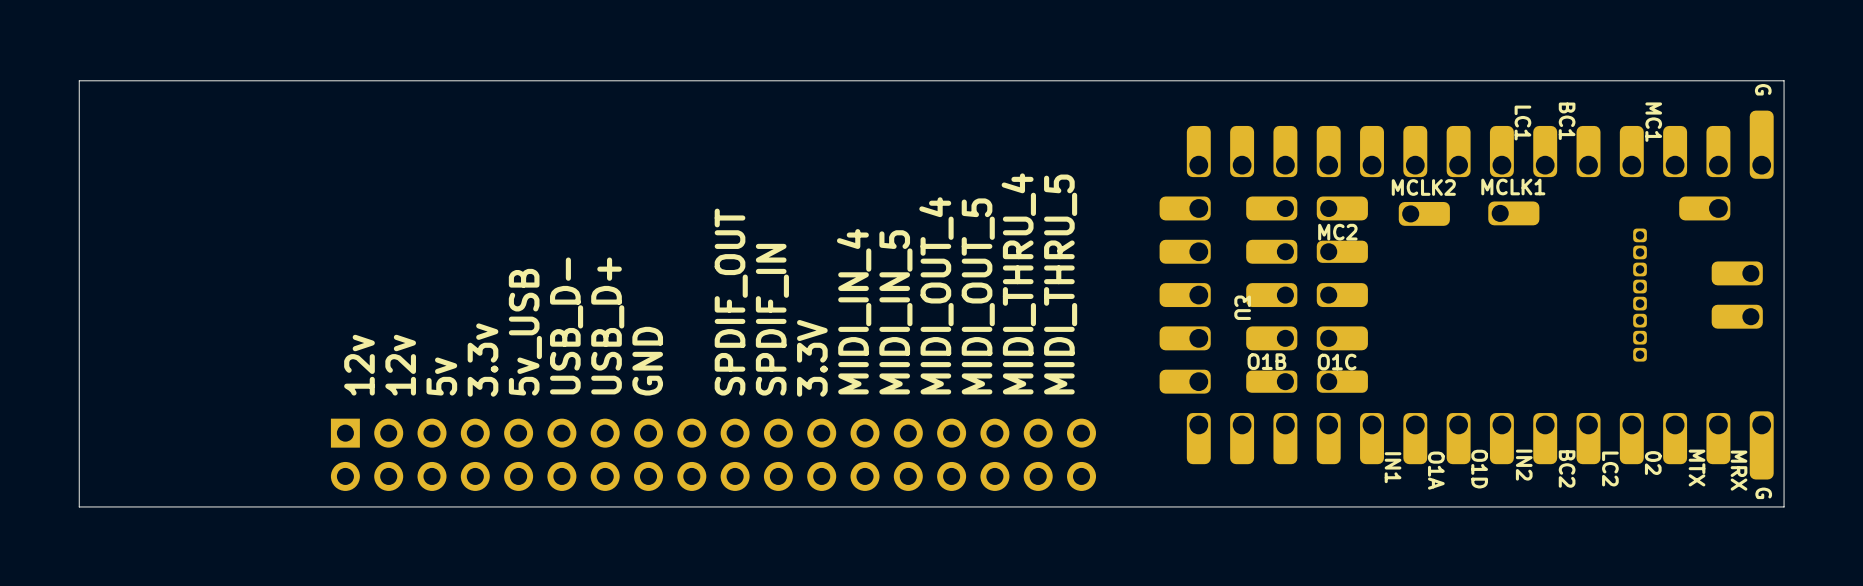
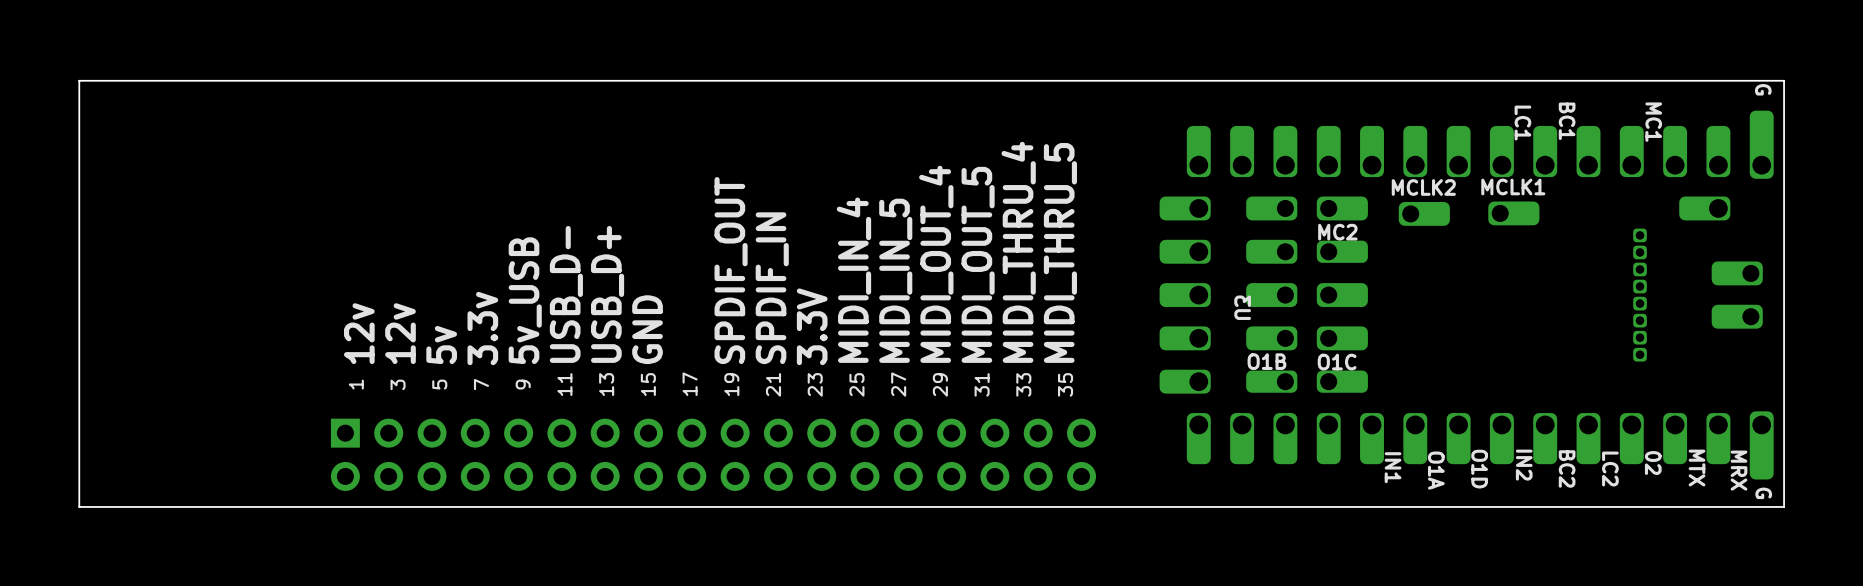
text position: MIDI_THRU_4 (1018, 283) -> MIDI_THRU_4 (1018, 252)
text position: MIDI_THRU_5 (1060, 284) -> MIDI_THRU_5 (1060, 252)
text position: MIDI_OUT_4 (936, 295) -> MIDI_OUT_4 (936, 264)
text position: MIDI_OUT_5 (978, 296) -> MIDI_OUT_5 (978, 264)
text position: SPDIF_OUT (731, 302) -> SPDIF_OUT (731, 270)
text position: MIDI_IN_4 (854, 311) -> MIDI_IN_4 (853, 280)
text position: MIDI_IN_5 (895, 312) -> MIDI_IN_5 (895, 280)
text position: SPDIF_IN (772, 319) -> SPDIF_IN (772, 288)
text position: USB_D- (566, 325) -> USB_D- (566, 294)
text position: USB_D+ (607, 325) -> USB_D+ (607, 294)
text position: 5v_USB (525, 332) -> 5v_USB (525, 300)
text: none -> 12v (359, 333)
text: none -> 12v (400, 333)
text position: 3.3V (812, 358) -> 3.3V (812, 326)
text position: 3.3v (483, 360) -> 3.3v (482, 328)
text position: GND (647, 361) -> GND (647, 329)
text: 12v (359, 365) -> none
text: 12v (400, 365) -> none
text position: 5v (441, 376) -> 5v (441, 345)
text: none -> 1 (356, 384)
text: none -> 3 (398, 384)
text: none -> 5 (439, 384)
text: none -> 7 (481, 384)
text: none -> 9 (523, 384)
text: none -> 11 (564, 384)
text: none -> 13 (606, 384)
text: none -> 15 (648, 384)
text: none -> 17 (690, 384)
text: none -> 19 (731, 384)
text: none -> 21 (773, 384)
text: none -> 23 (815, 384)
text: none -> 25 (856, 384)
text: none -> 27 (898, 384)
text: none -> 29 (940, 384)
text: none -> 31 (982, 384)
text: none -> 33 (1023, 384)
text: none -> 35 (1065, 384)

